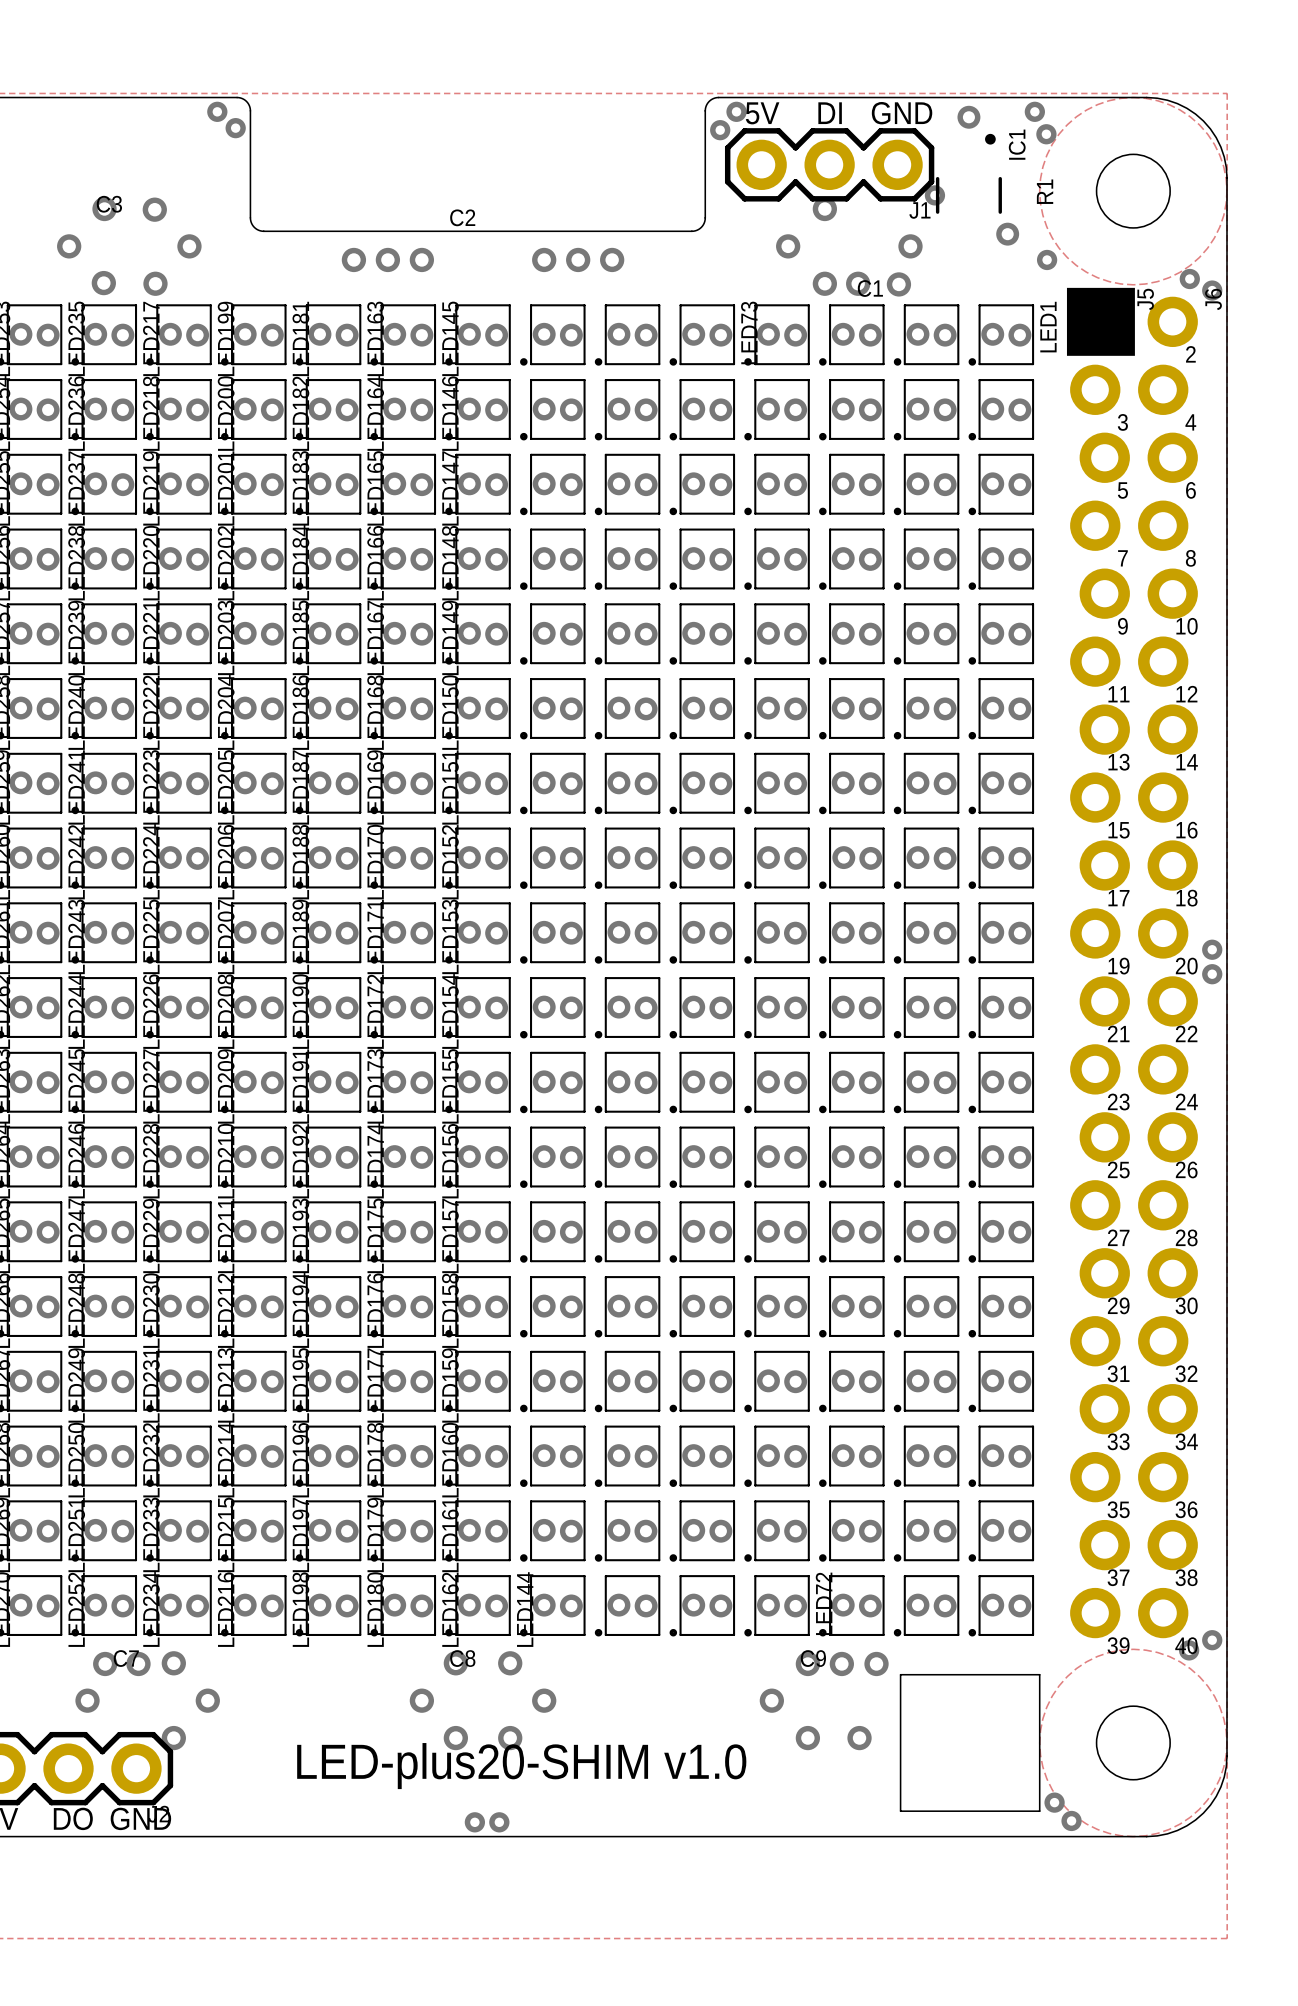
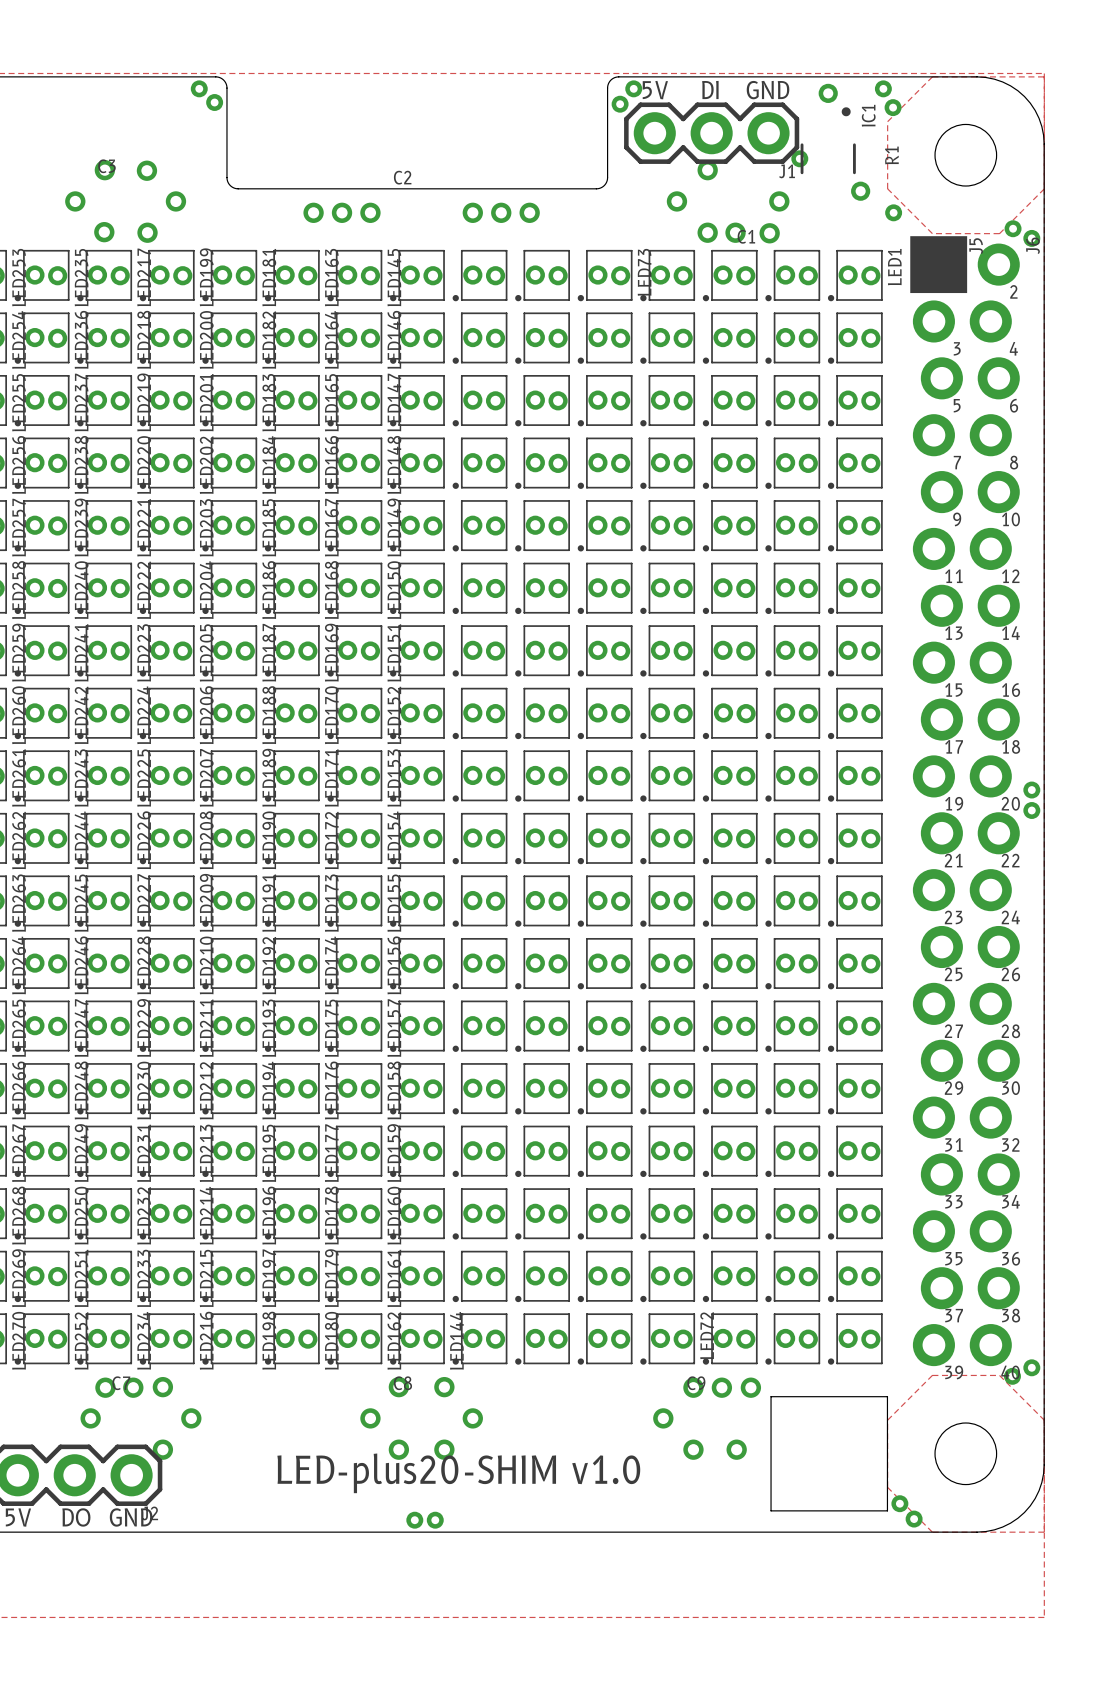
zone outline: (1133, 97) (1109, 100) (1097, 104) (1086, 110) (1067, 124) (1059, 134) (1046, 155) (1042, 166) (1039, 191) (1042, 215) (1046, 226) (1059, 248) (1067, 257) (1076, 265) (1097, 277) (1109, 281) (1133, 284) (1157, 281) (1169, 277) (1190, 265) (1199, 257) (1207, 248) (1219, 226) (1223, 215) (1226, 191) (1223, 166) (1219, 155) (1207, 134) (1199, 124) (1180, 110) (1169, 104) (1157, 100) (1133, 97) -> none
zone outline: none -> (1044, 76) (932, 76) (887, 121) (887, 188) (932, 233) (999, 233) (1044, 188)
zone outline: (1133, 1649) (1121, 1650) (1097, 1656) (1076, 1668) (1067, 1676) (1059, 1685) (1046, 1707) (1042, 1718) (1039, 1742) (1042, 1767) (1046, 1778) (1059, 1799) (1067, 1809) (1076, 1817) (1097, 1829) (1121, 1835) (1133, 1836) (1145, 1835) (1169, 1829) (1190, 1817) (1199, 1809) (1207, 1799) (1219, 1778) (1223, 1767) (1226, 1742) (1223, 1718) (1219, 1707) (1207, 1685) (1199, 1676) (1190, 1668) (1169, 1656) (1145, 1650) (1133, 1649) -> none
zone outline: none -> (1044, 1420) (999, 1375) (932, 1375) (887, 1420) (887, 1487) (932, 1532) (1044, 1532)

